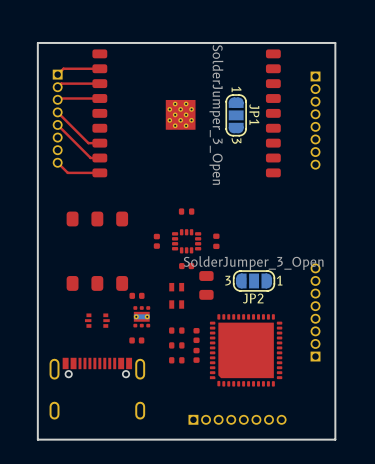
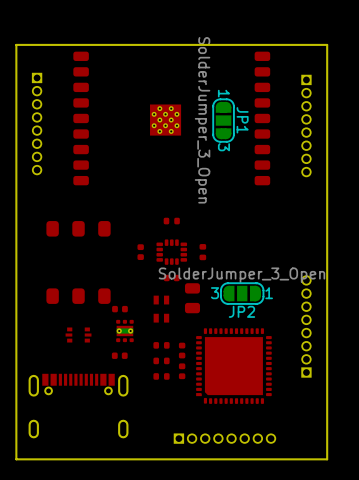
top track: (99, 68) (63, 68) (57, 74) -> none
top track: (99, 83) (61, 83) (57, 87) -> none
top track: (99, 98) (57, 99) -> none
top track: (57, 112) (88, 143) (99, 143) -> none
top track: (57, 124) (90, 158) (99, 158) -> none
top track: (57, 162) (67, 172) (99, 172) -> none

